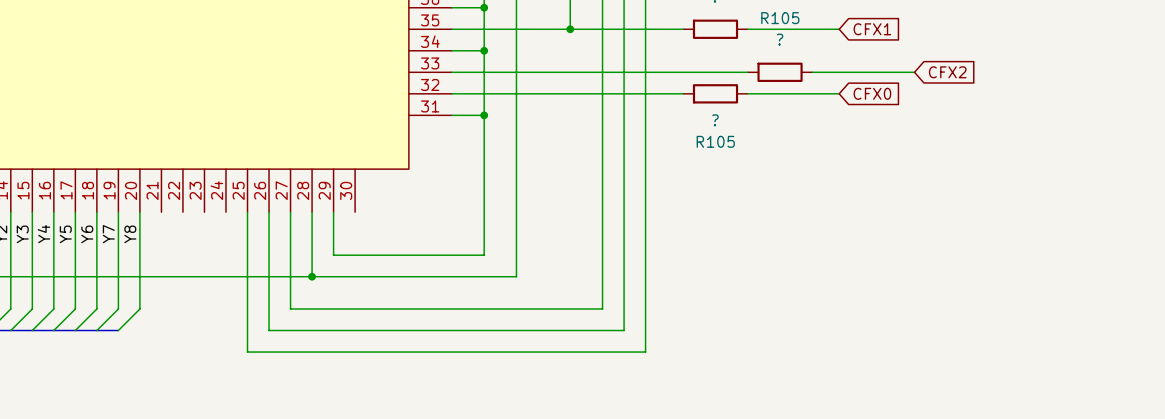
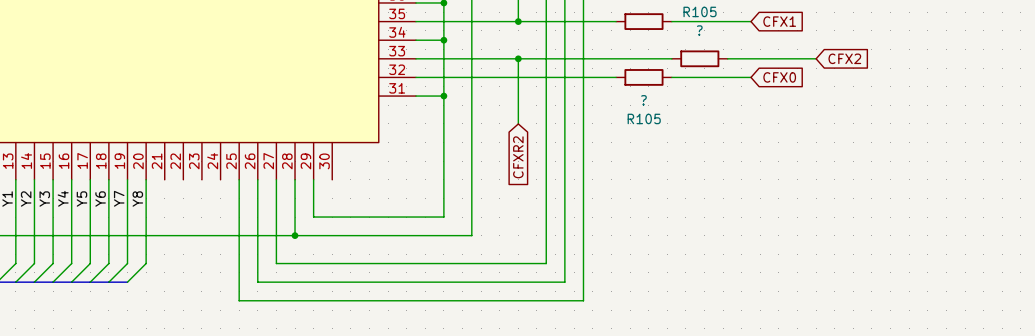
wire: none -> (518, 58) (518, 123)
junction: none -> (518, 58)
global label: none -> CFXR2 (518, 157)

